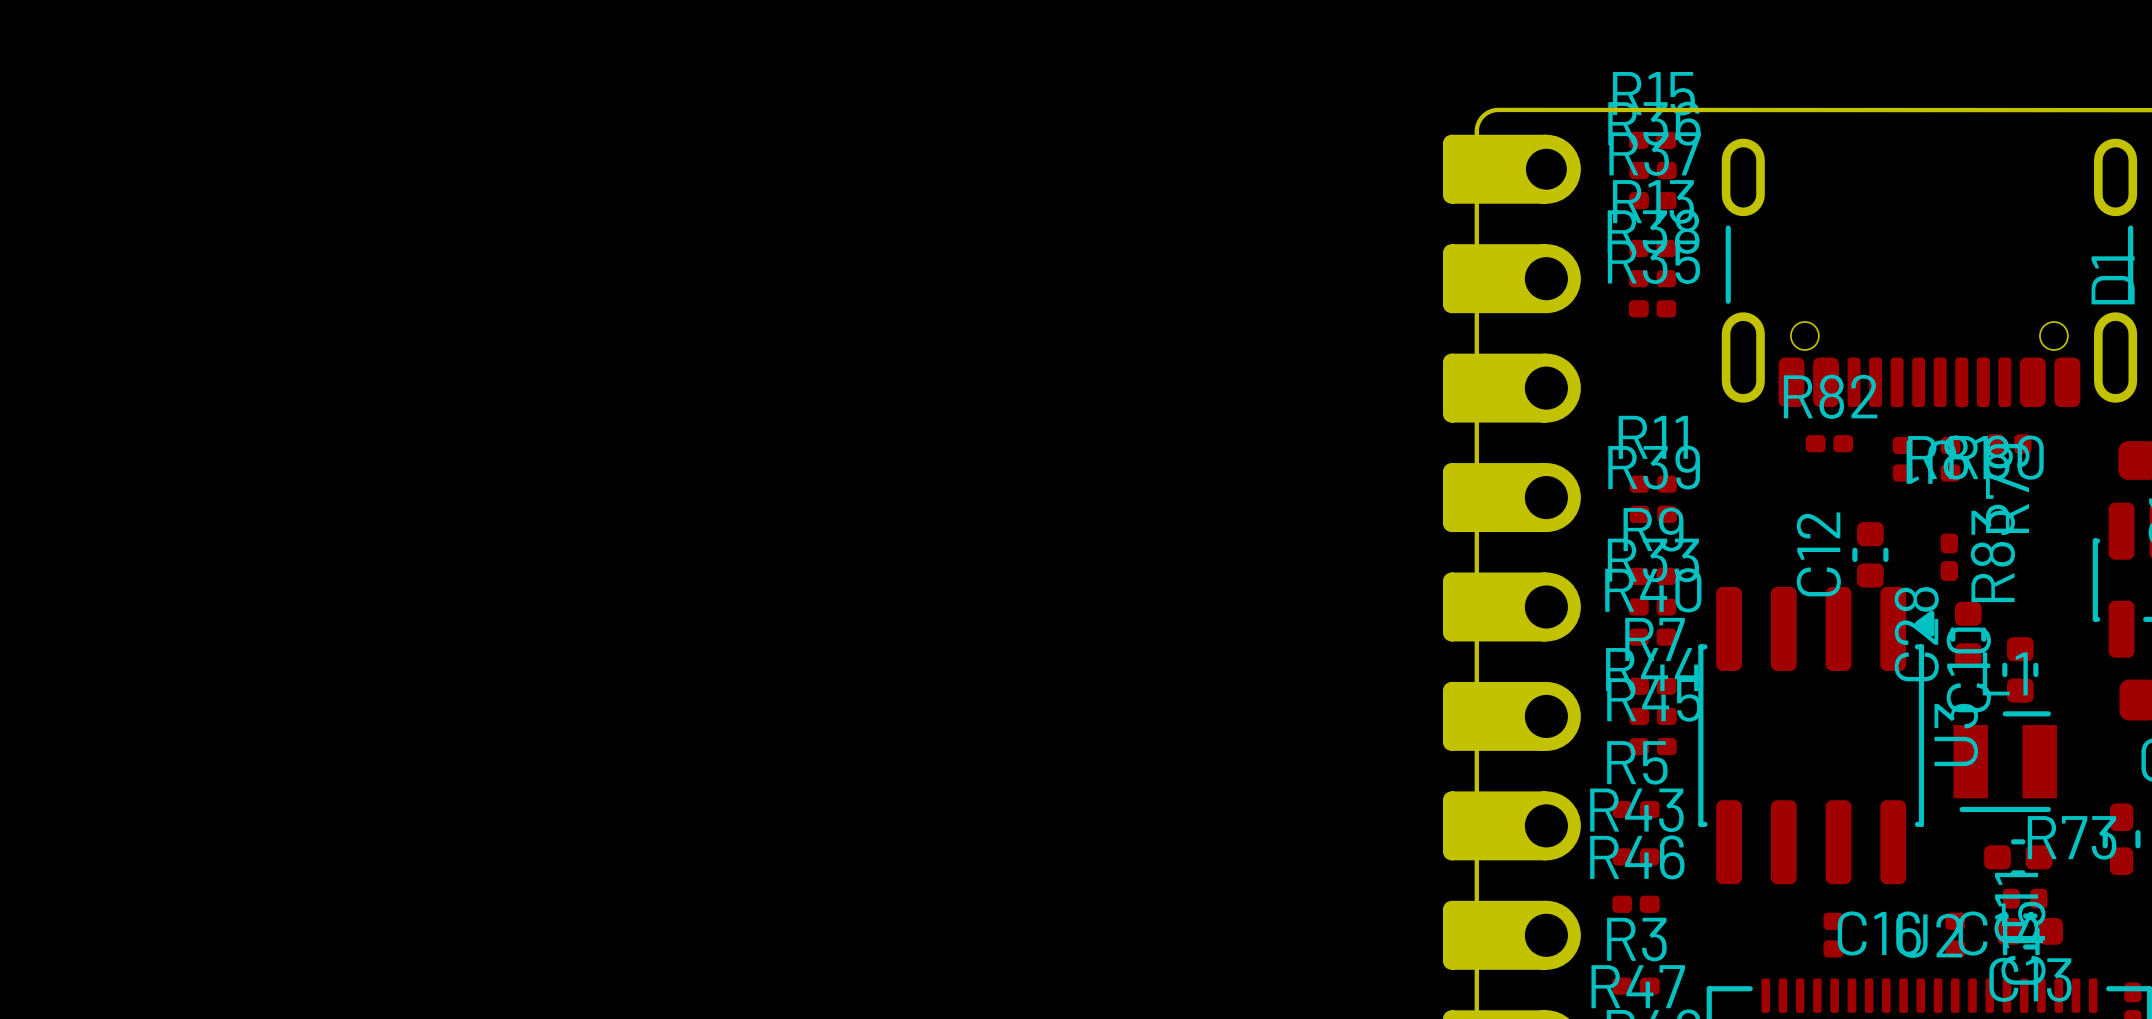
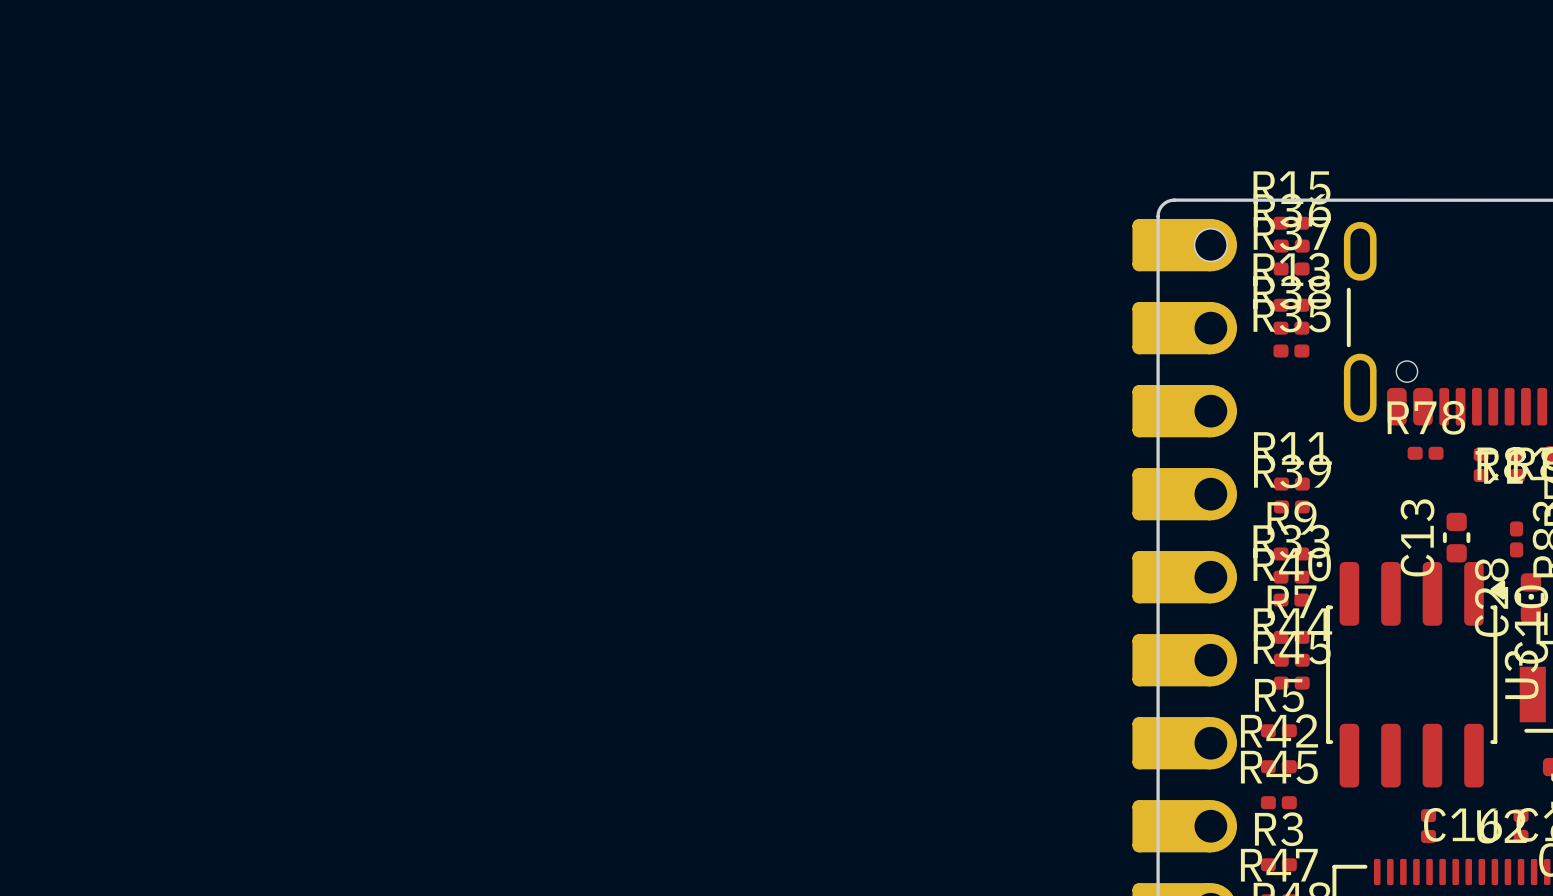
R82 name: R82 (1830, 396) -> R78 (1426, 417)
C12 name: C12 (1818, 554) -> C13 (1417, 537)
R43 name: R43 (1636, 810) -> R42 (1279, 730)
R46 name: R46 (1637, 857) -> R45 (1279, 767)

